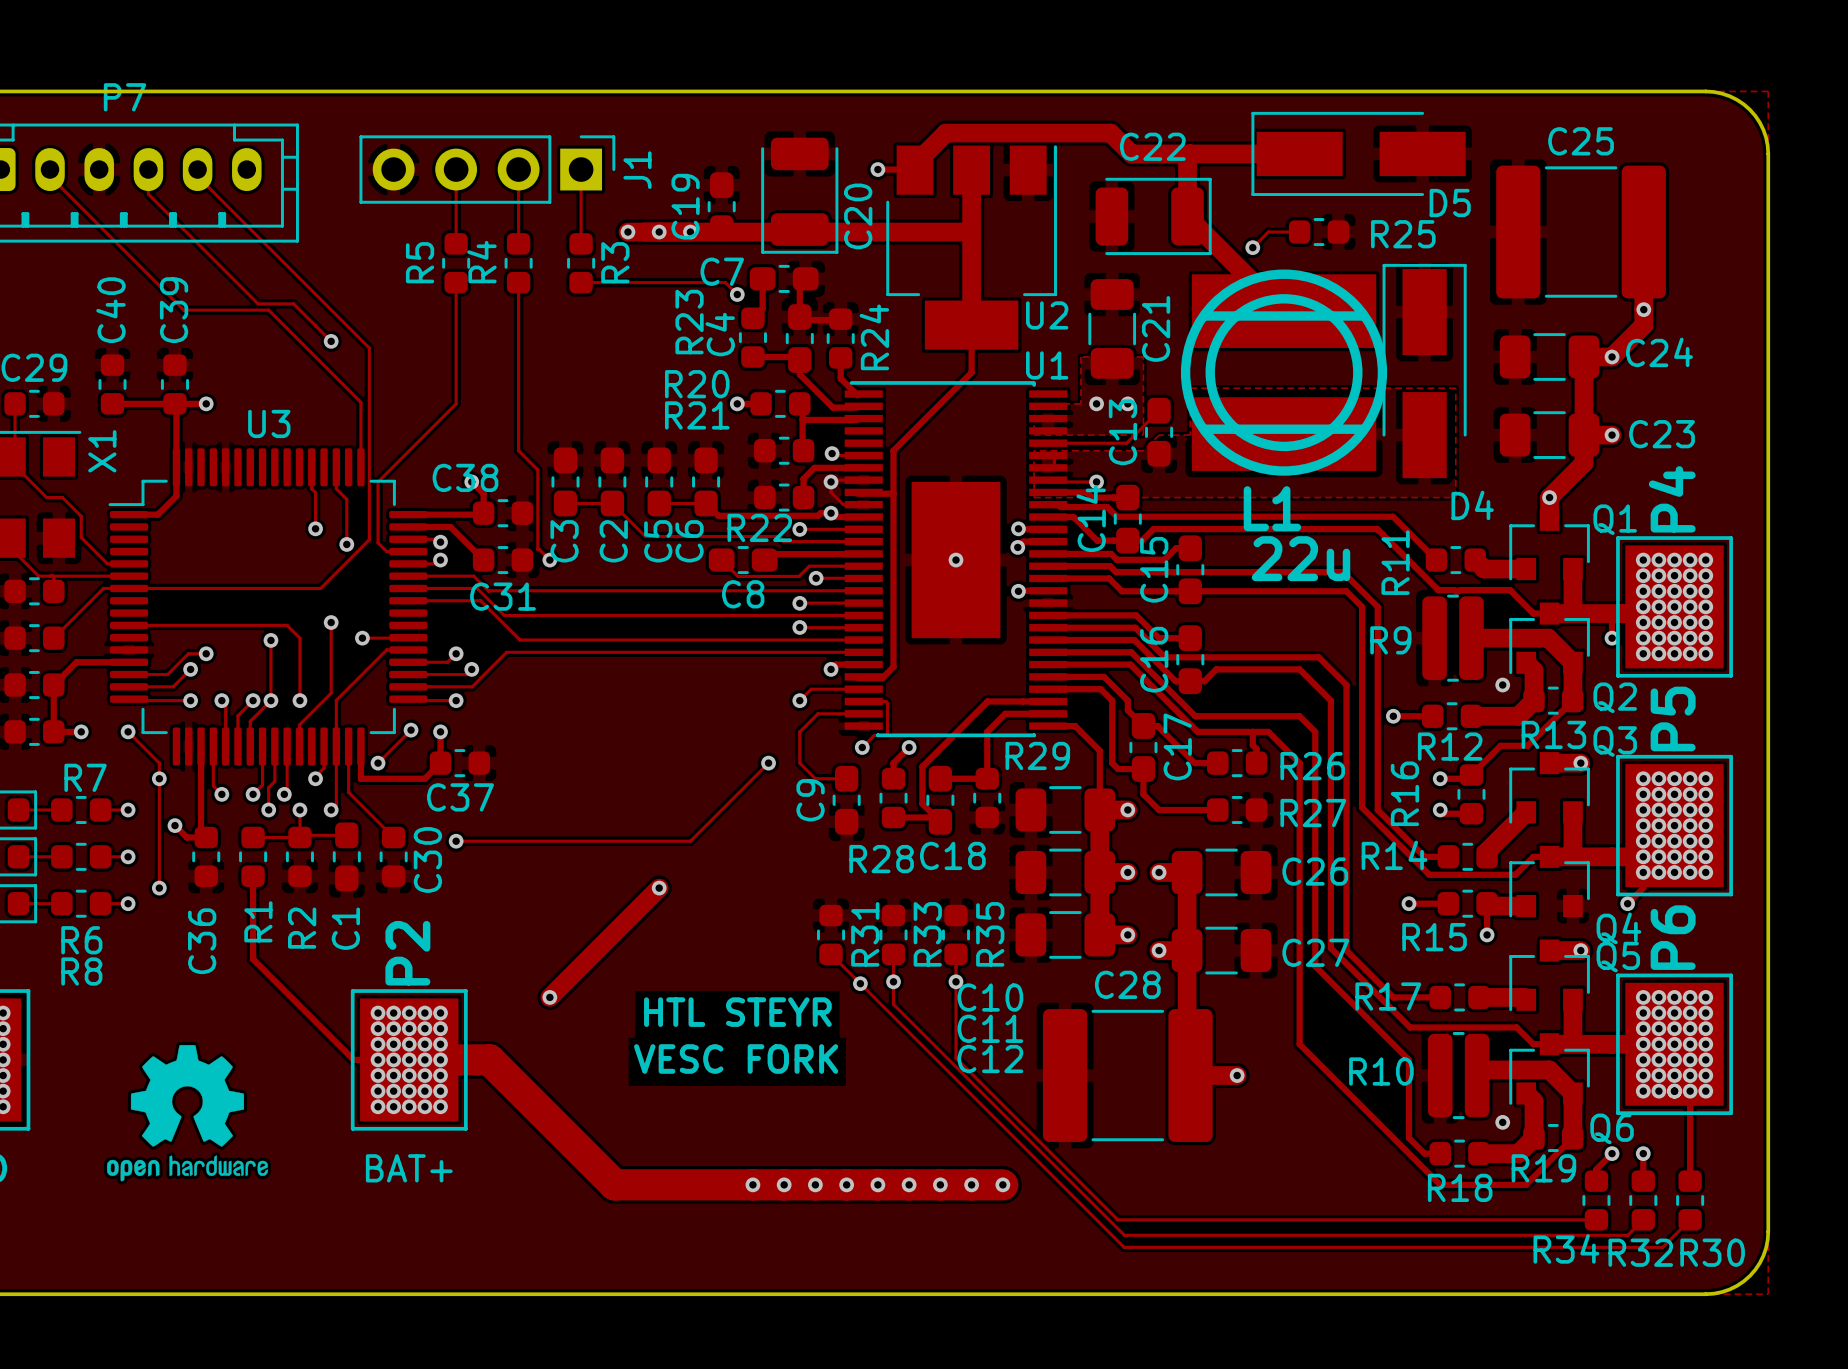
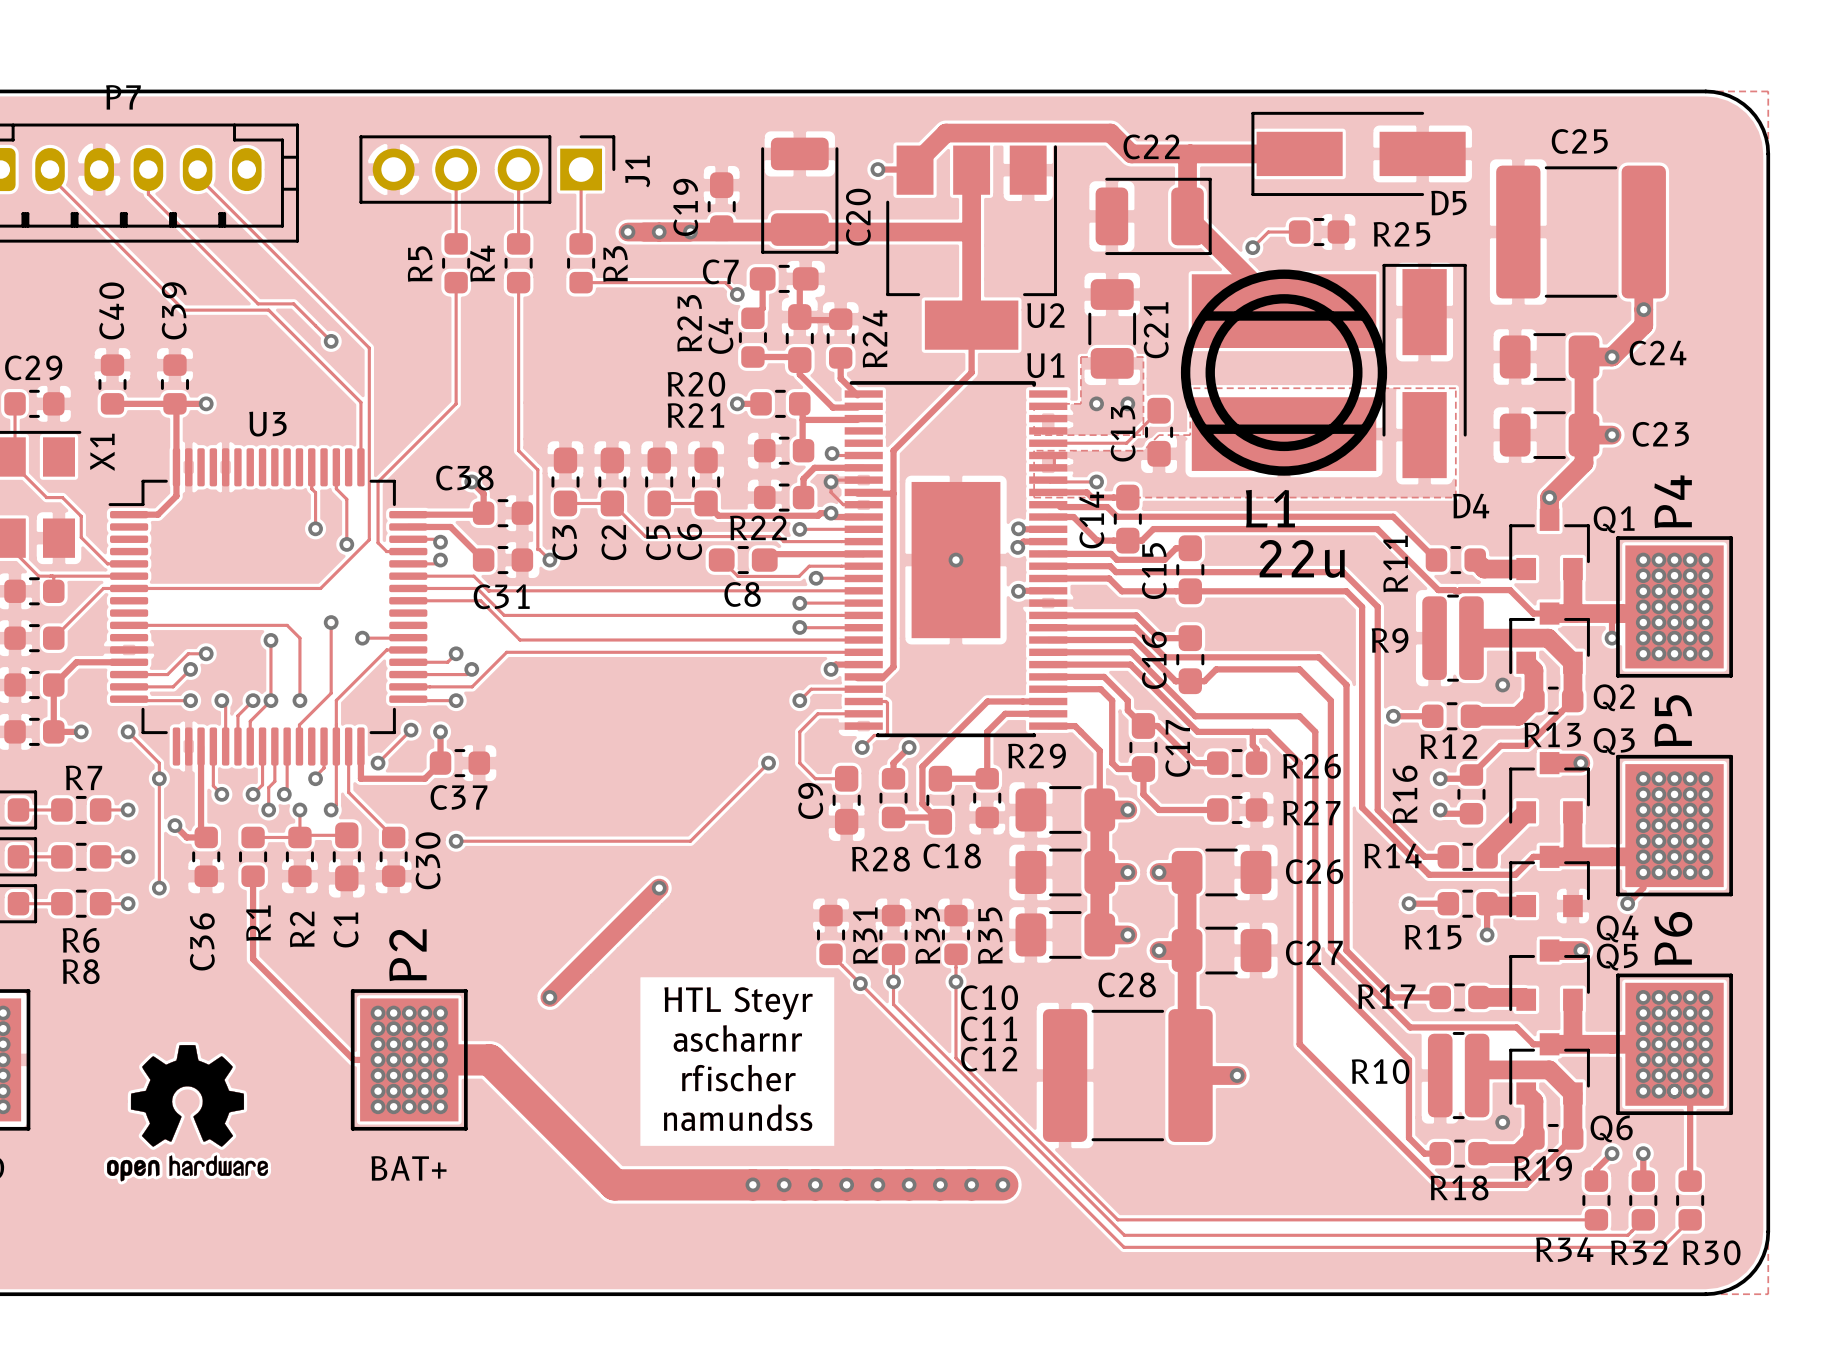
text: none -> HTL Steyr (738, 1003)
text: HTL STEYR (737, 1012) -> none
text: none -> ascharnr (737, 1038)
text: VESC FORK (736, 1058) -> none
text: none -> rfischer (738, 1078)
text: none -> namundss (738, 1117)

